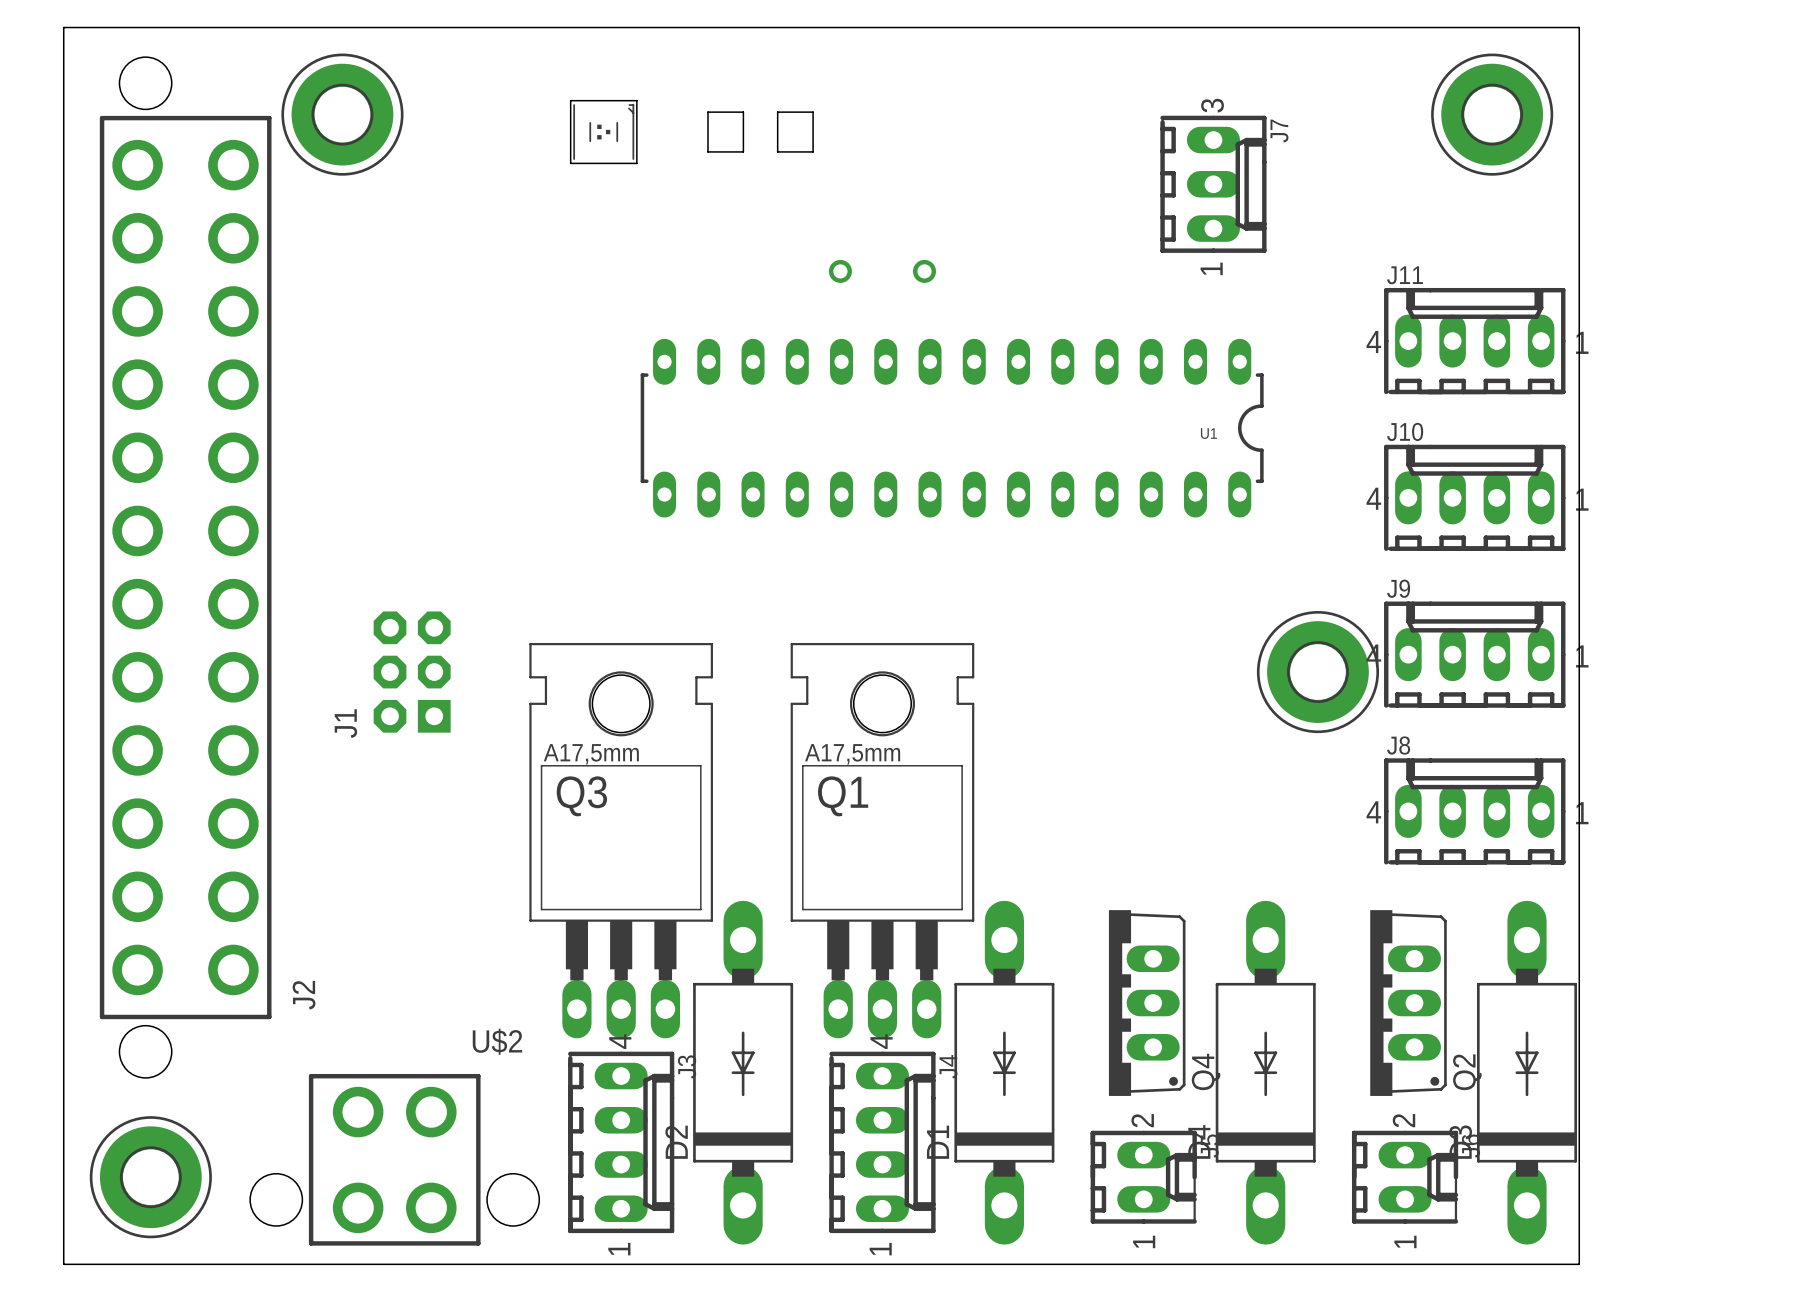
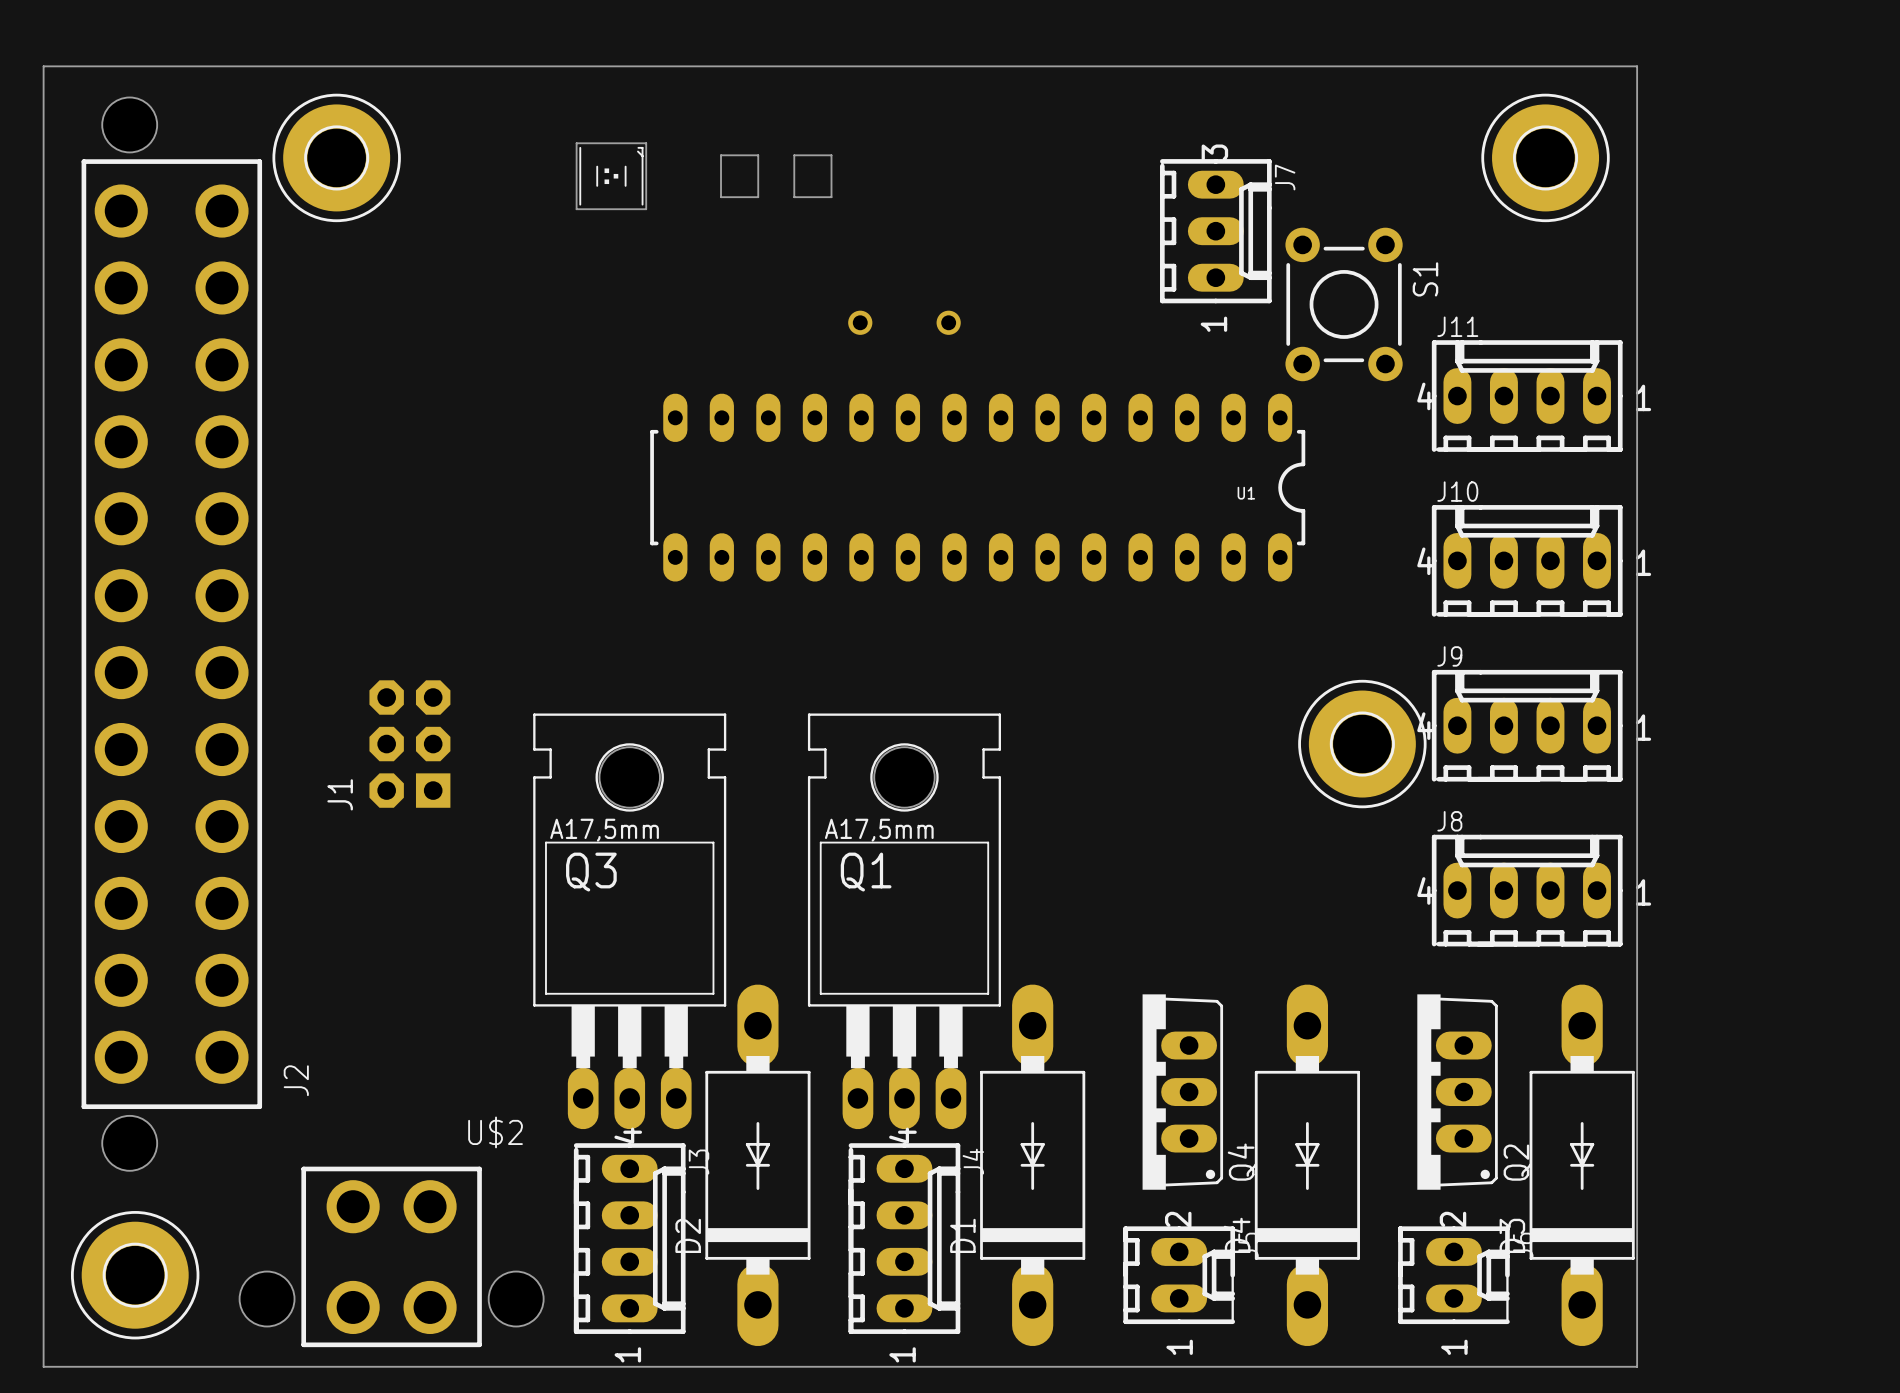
J7 position: (1213, 184) -> (1215, 231)
S1: none -> (1344, 304)

